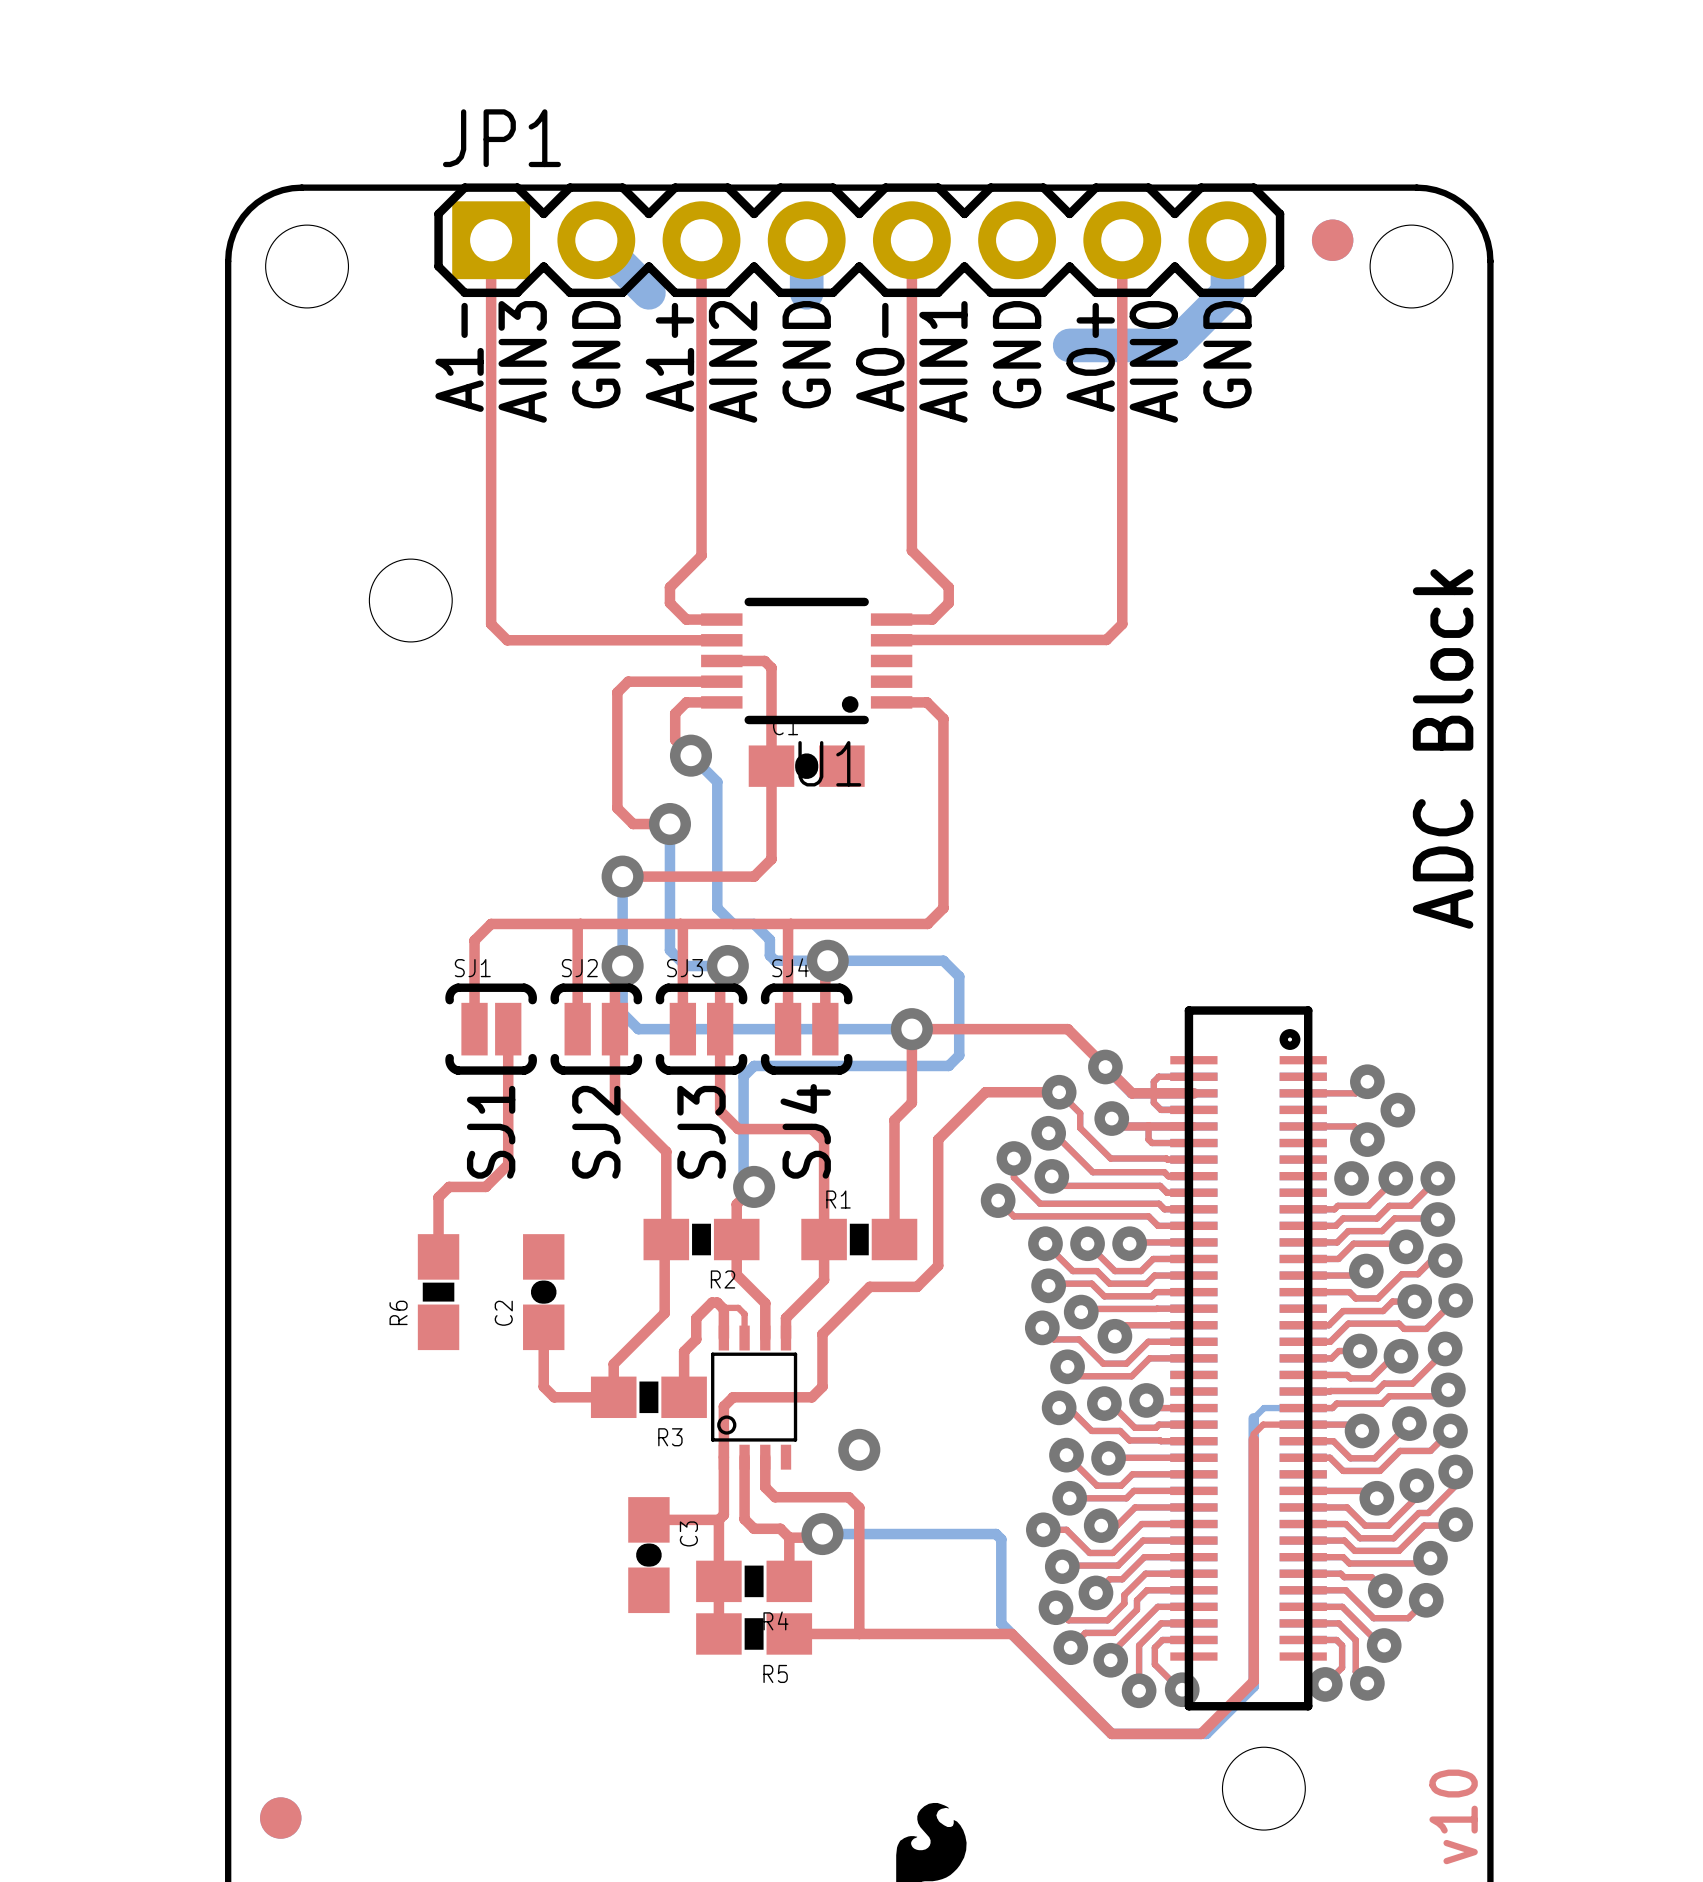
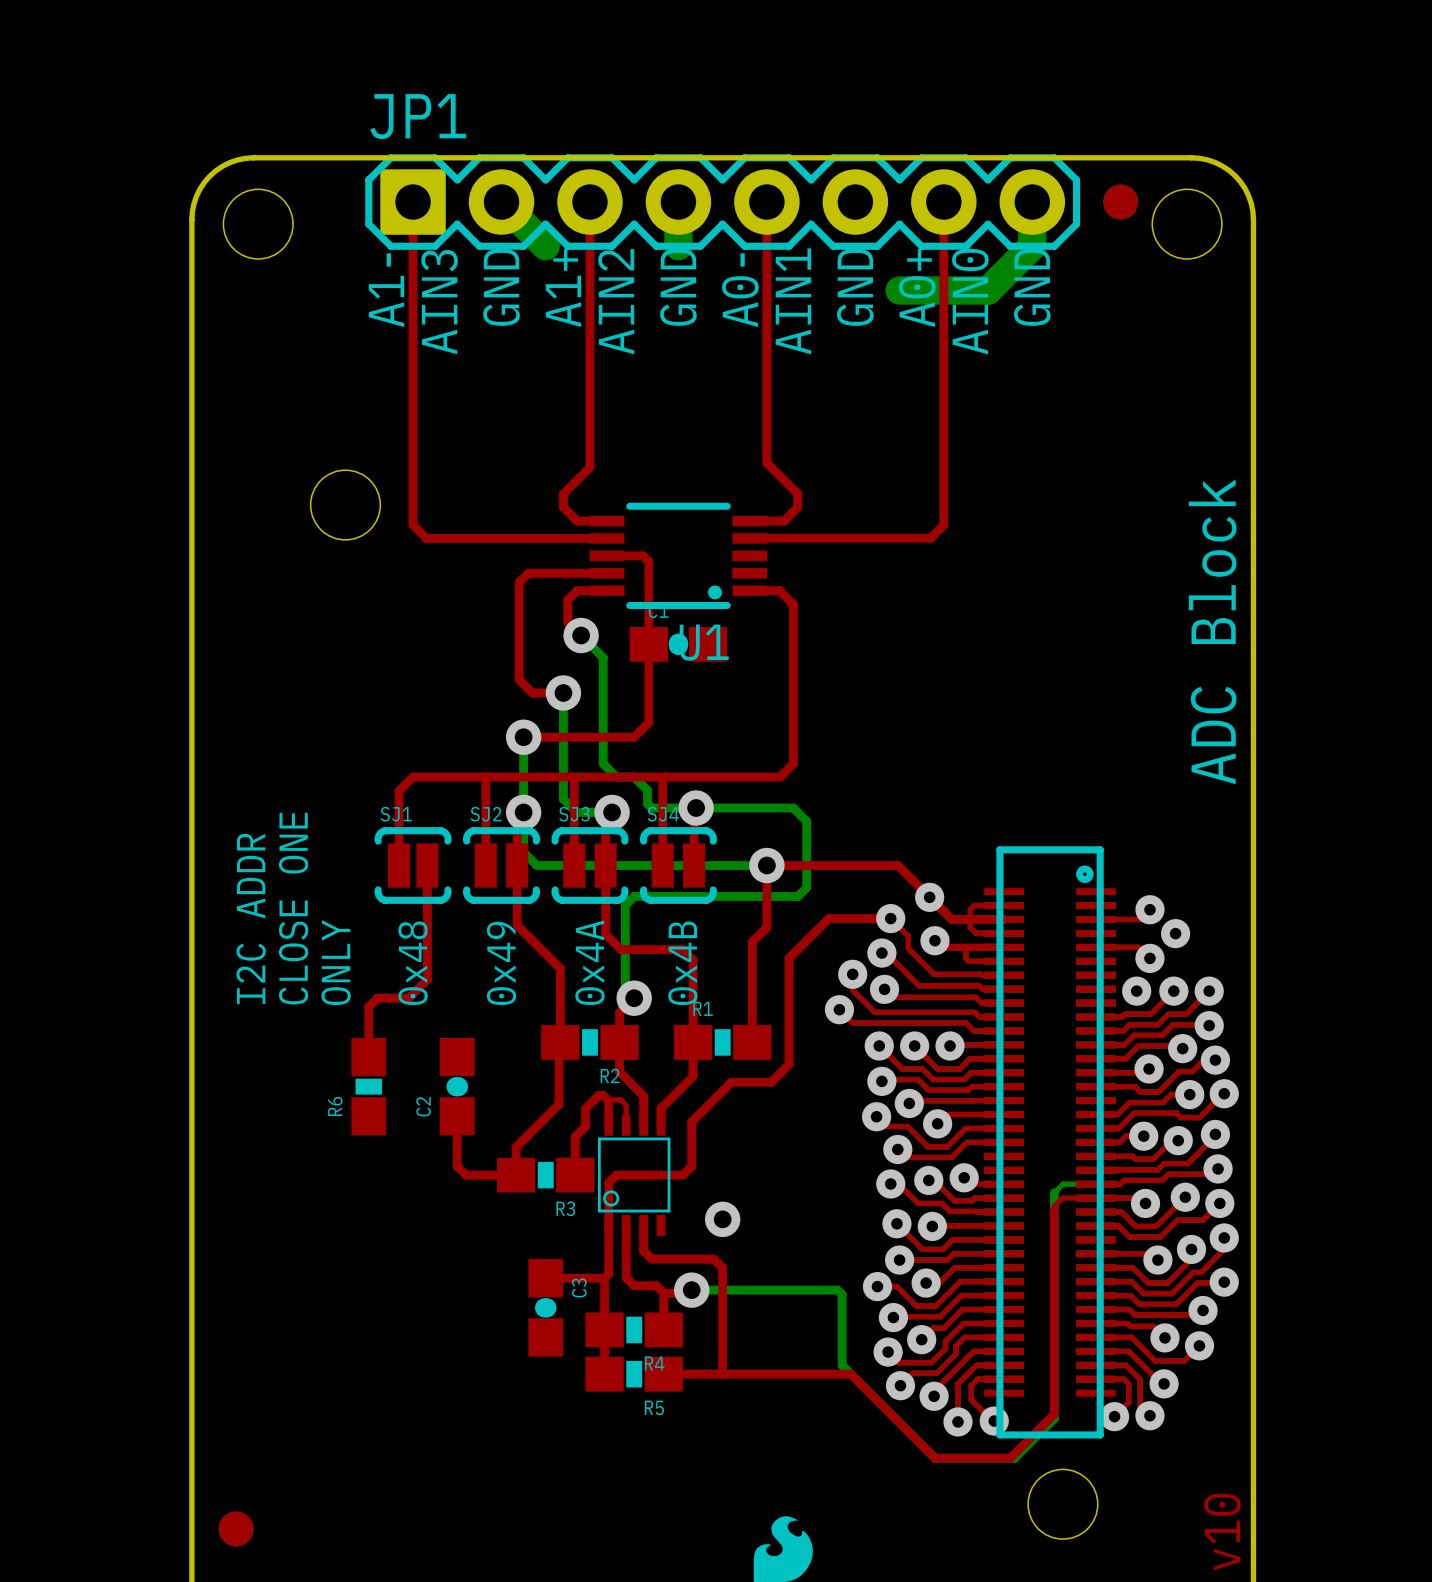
text: none -> CLOSE ONE (293, 908)
text: none -> I2C ADDR (251, 918)
text: SJ4 (805, 1131) -> 0x4B (682, 963)
text: SJ1 (491, 1132) -> 0x48 (413, 963)
text: SJ2 (596, 1132) -> 0x49 (501, 963)
text: SJ3 (701, 1132) -> 0x4A (589, 962)
text: none -> ONLY (336, 962)

